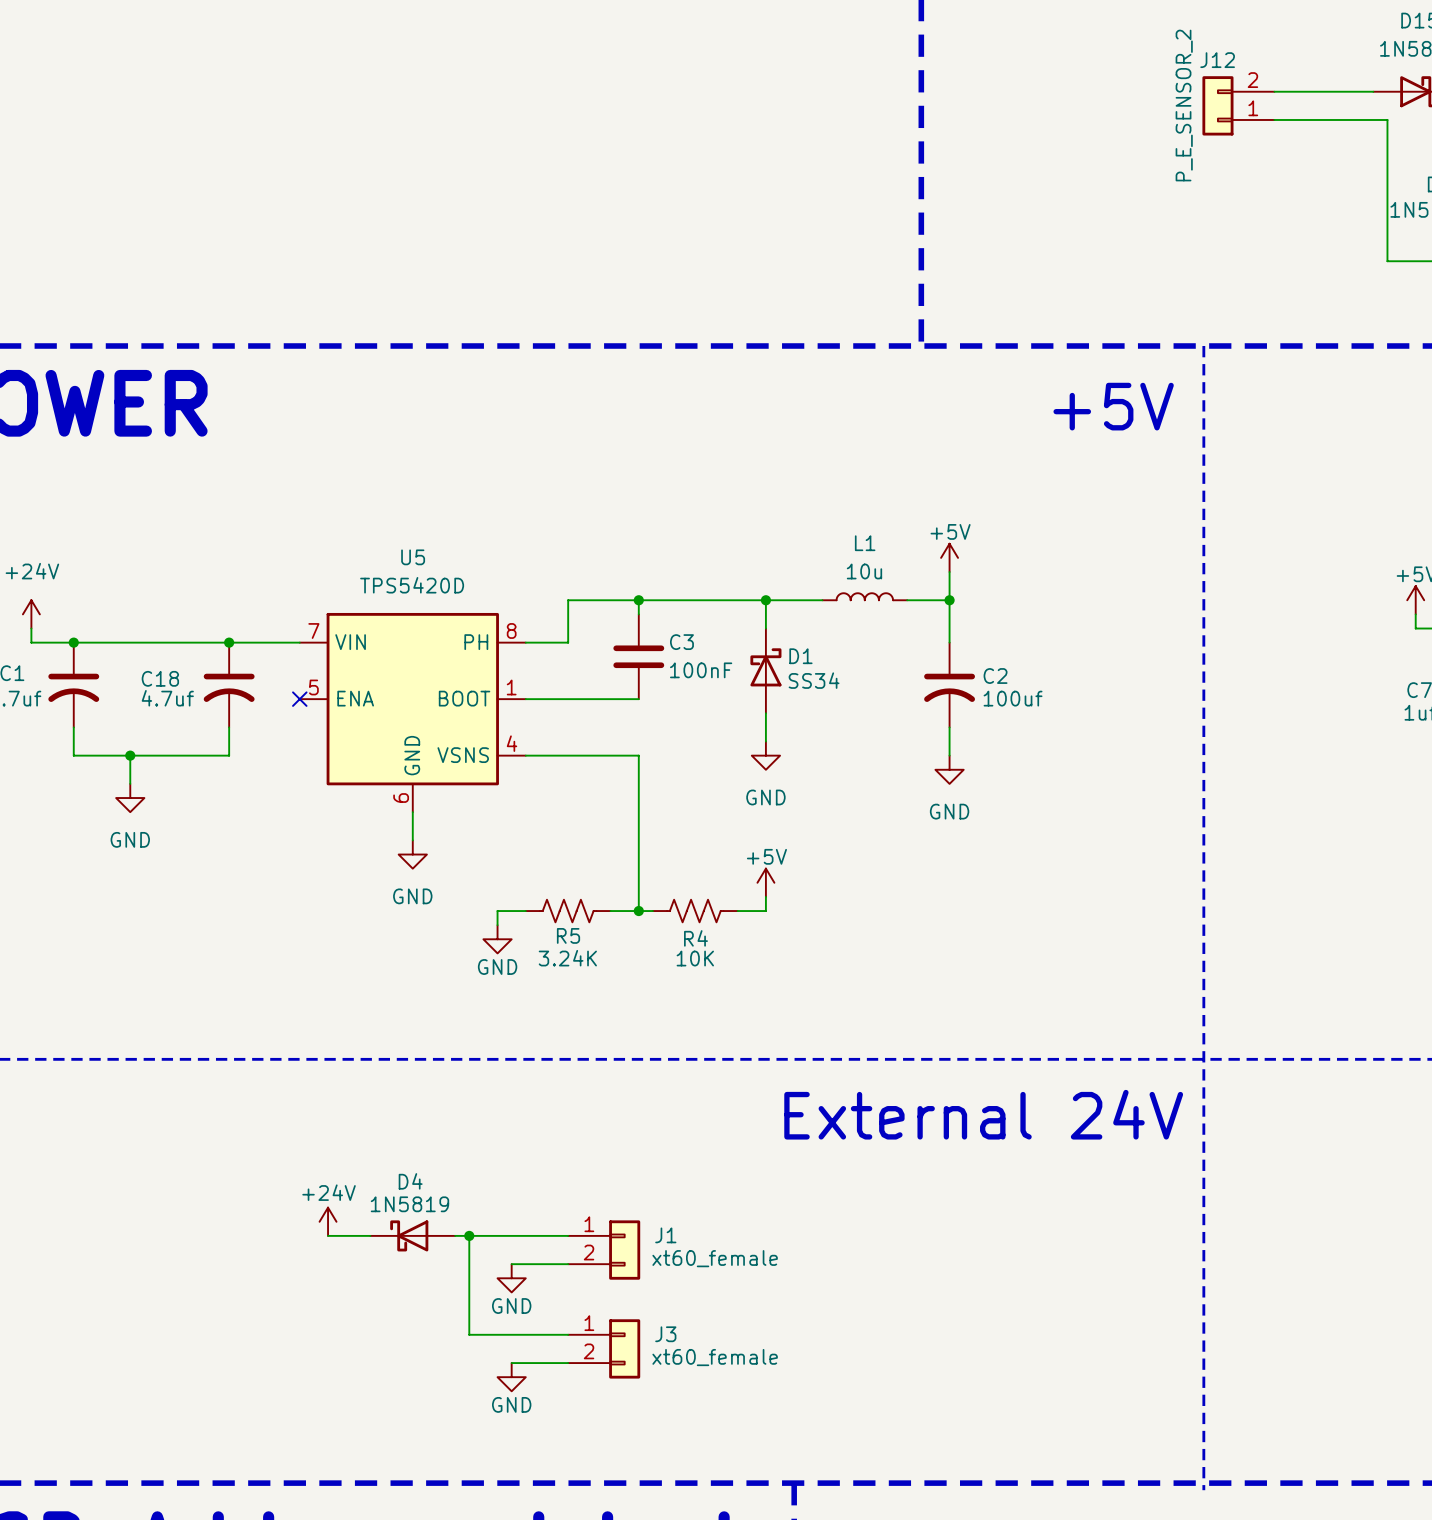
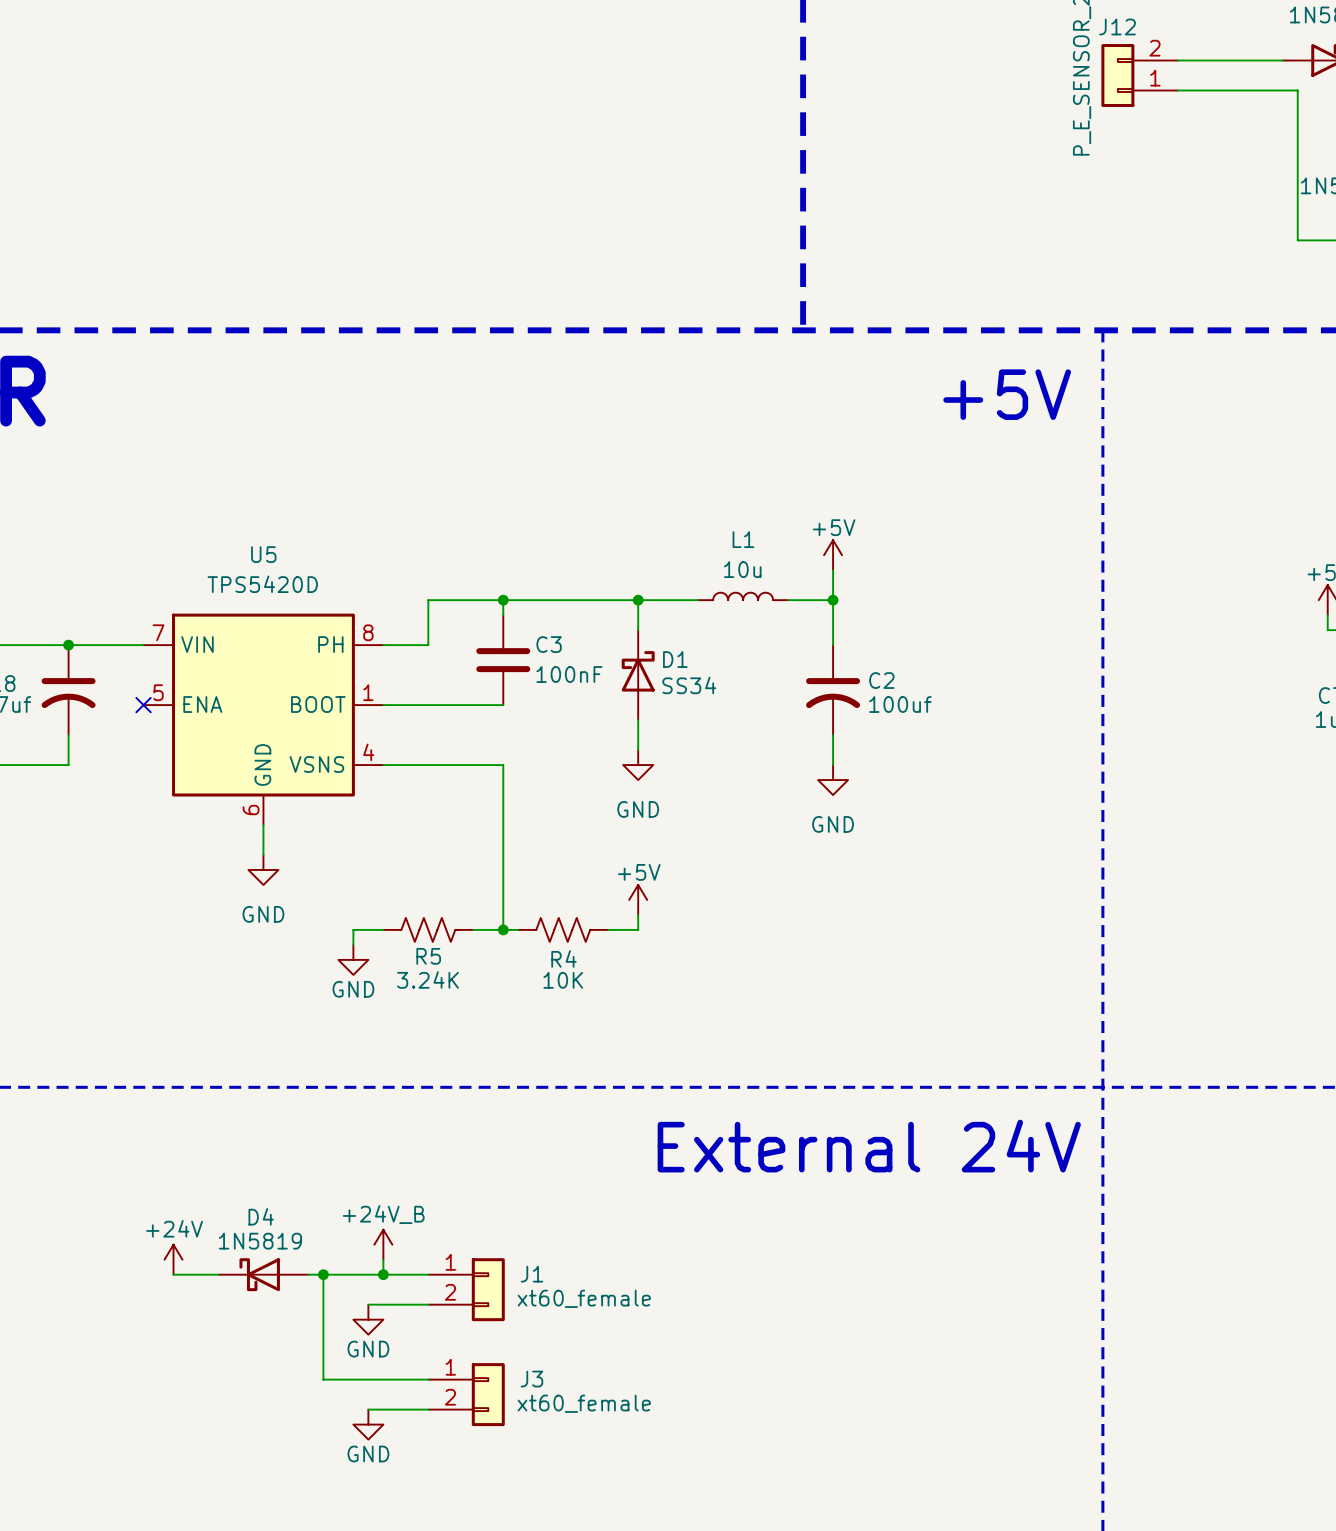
power symbol: none -> +24V_B (383, 1244)
wire: none -> (383, 1259) (383, 1274)
junction: none -> (383, 1274)

